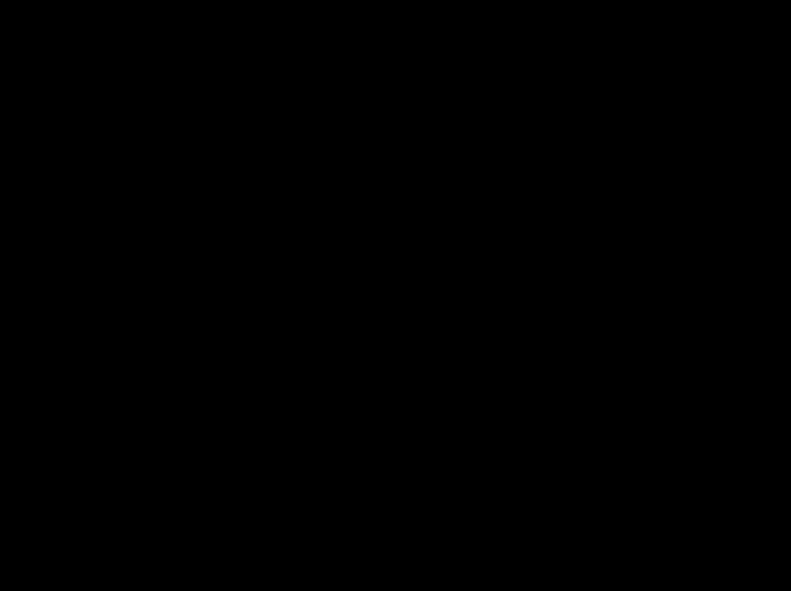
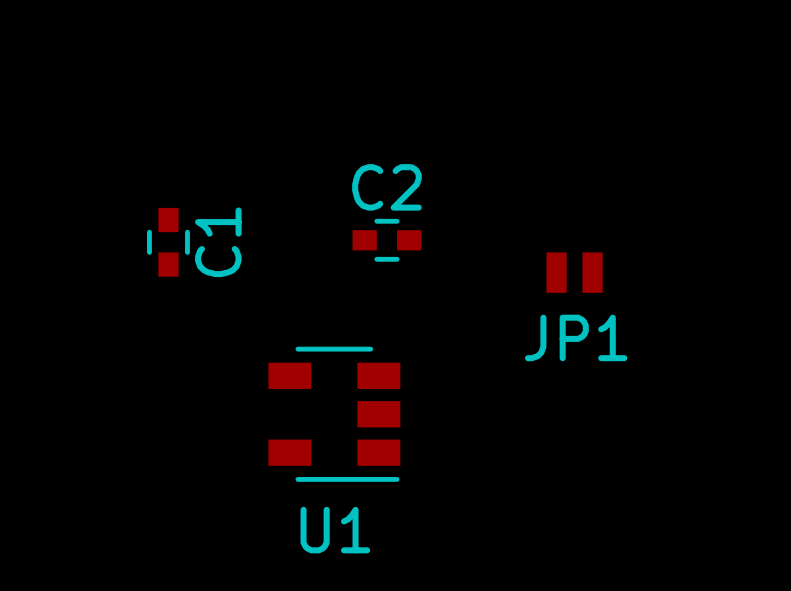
C2: none -> (386, 240)
C1: none -> (168, 242)
JP1: none -> (574, 272)
U1: none -> (334, 414)

